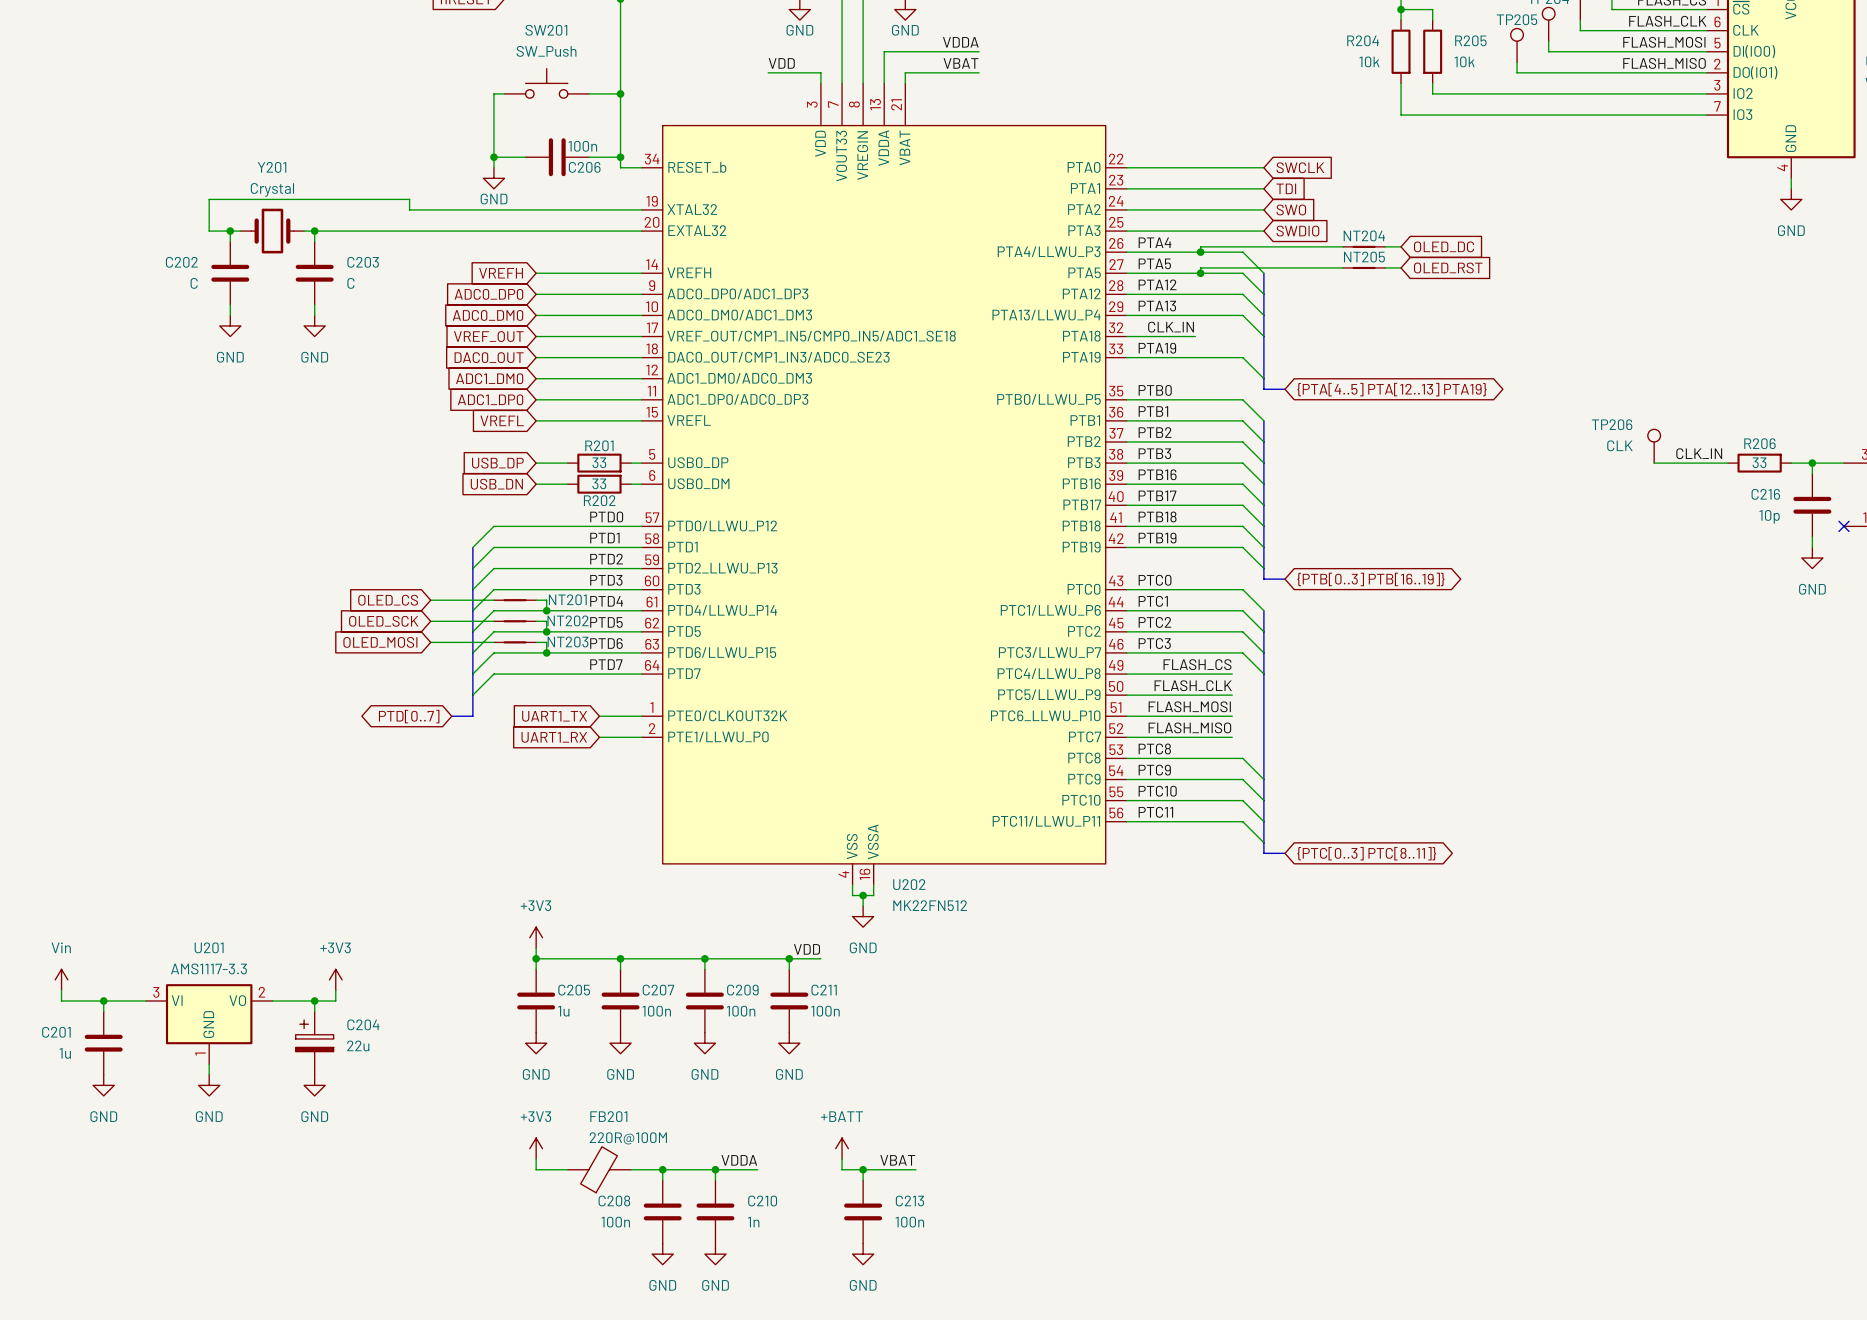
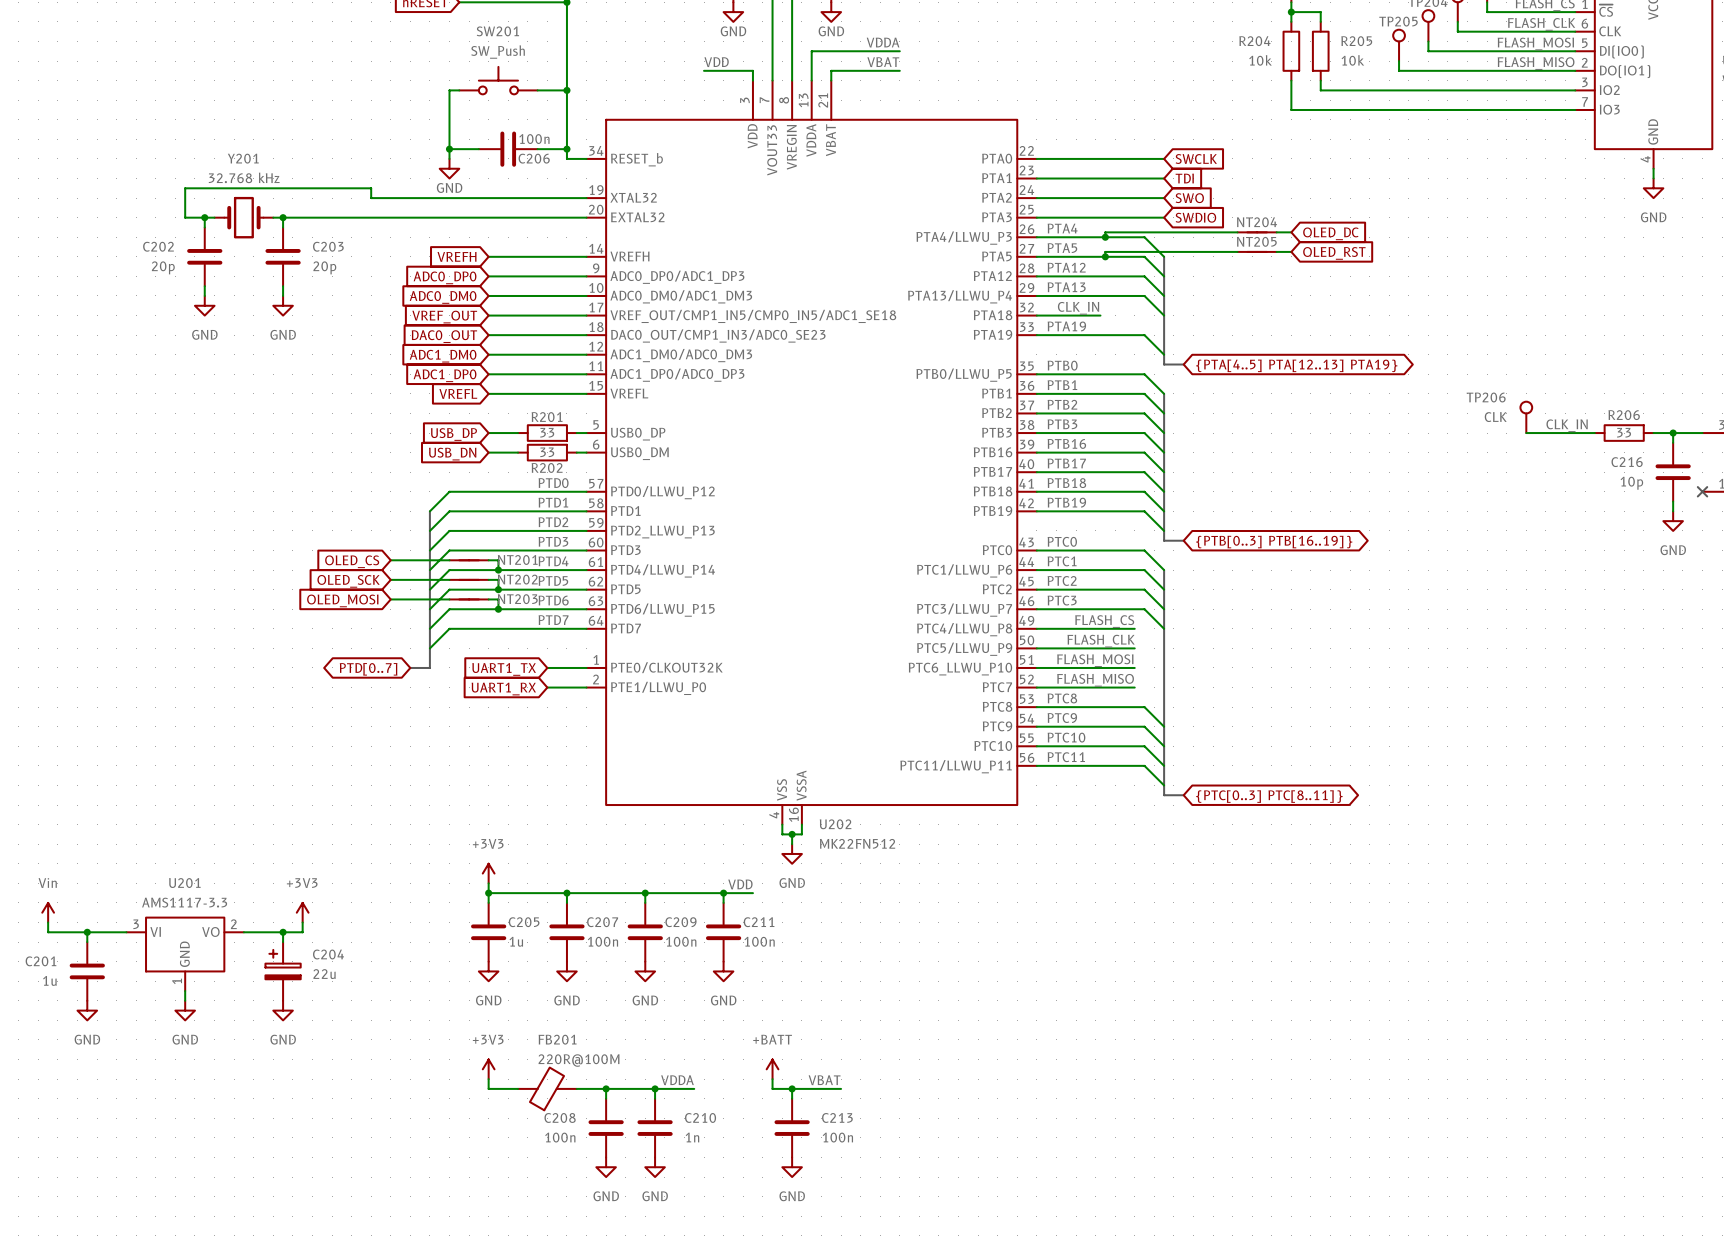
Y201 value: Crystal (272, 189) -> 32.768 kHz (244, 177)
C202 value: C (194, 283) -> 20p (163, 267)
C203 value: C (350, 283) -> 20p (324, 267)

